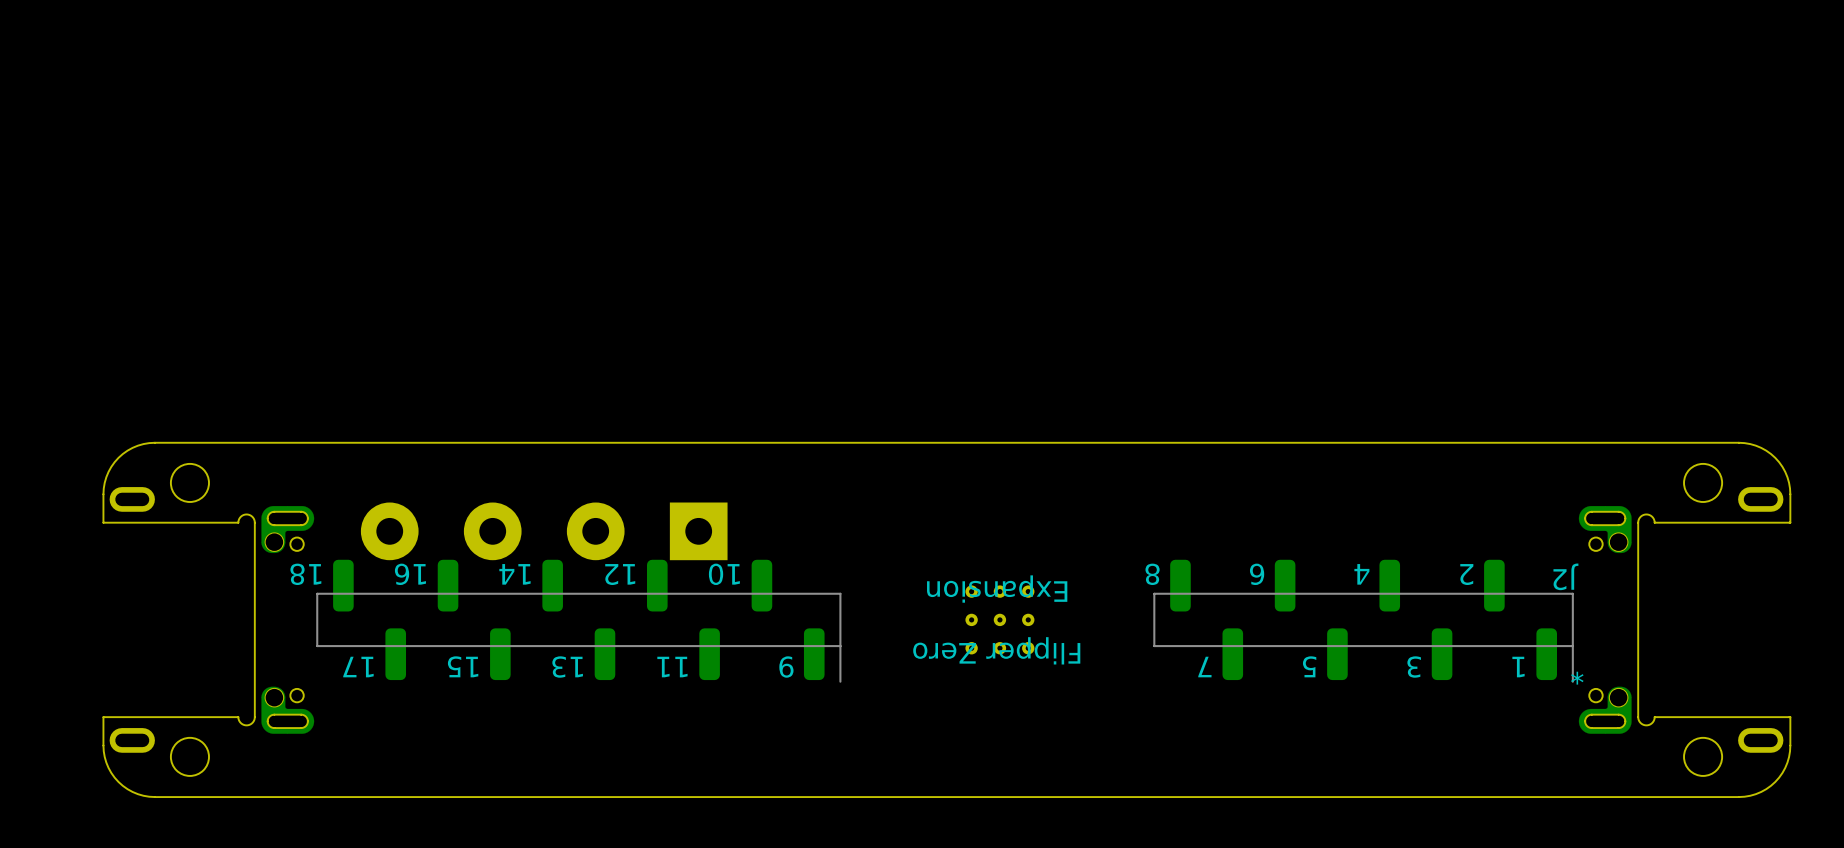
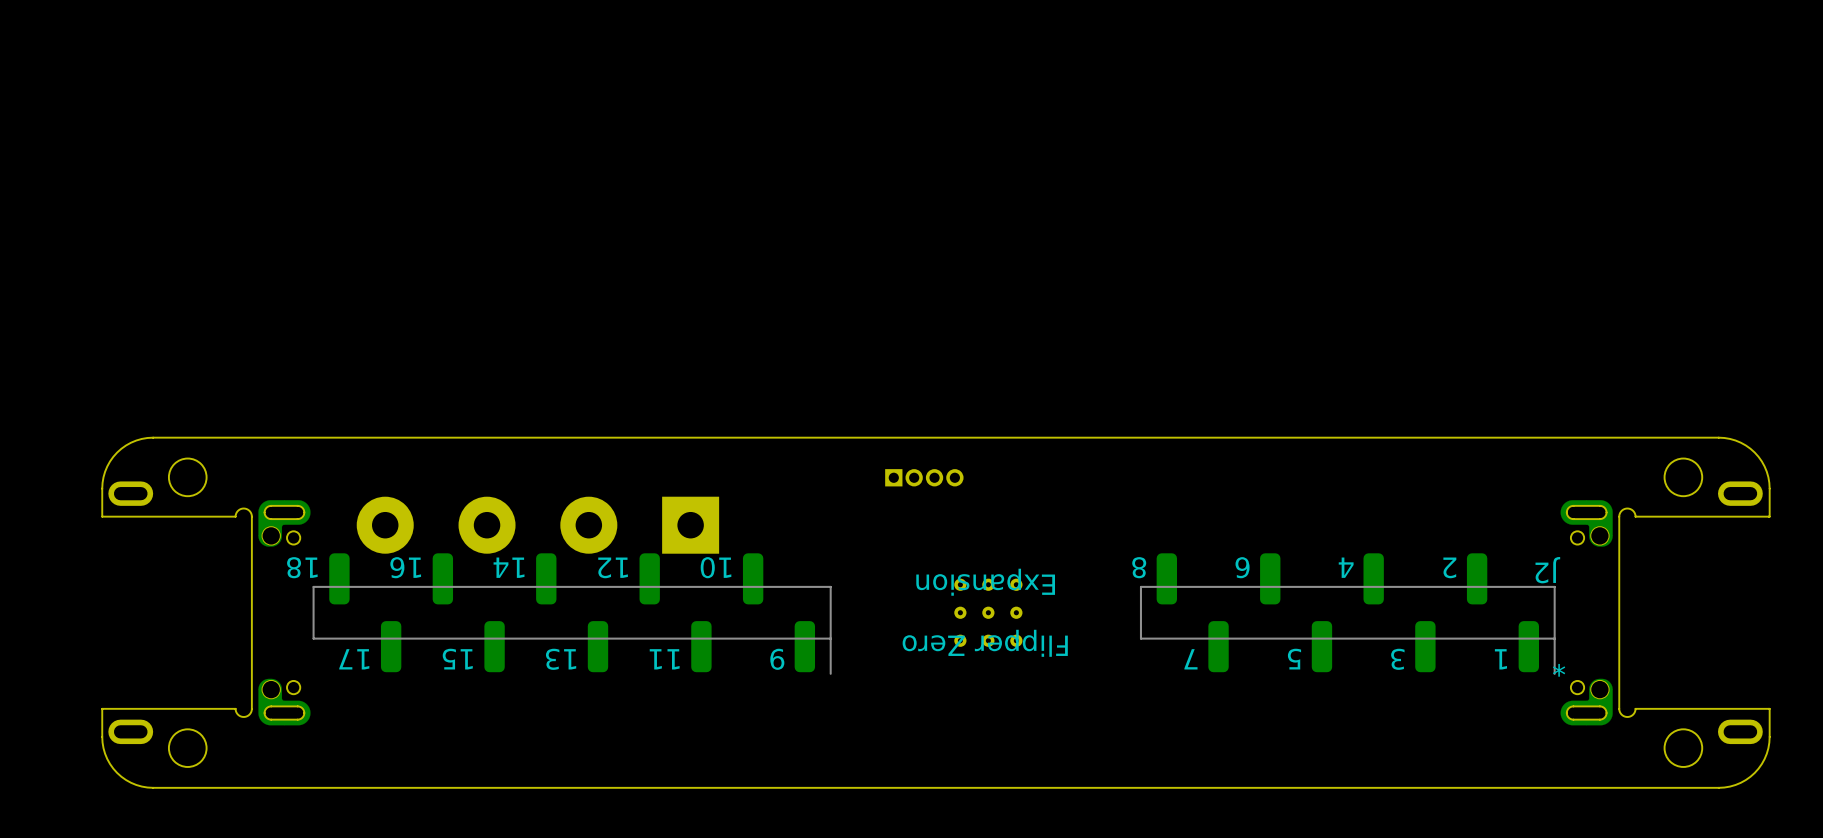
part: none -> (924, 477)

